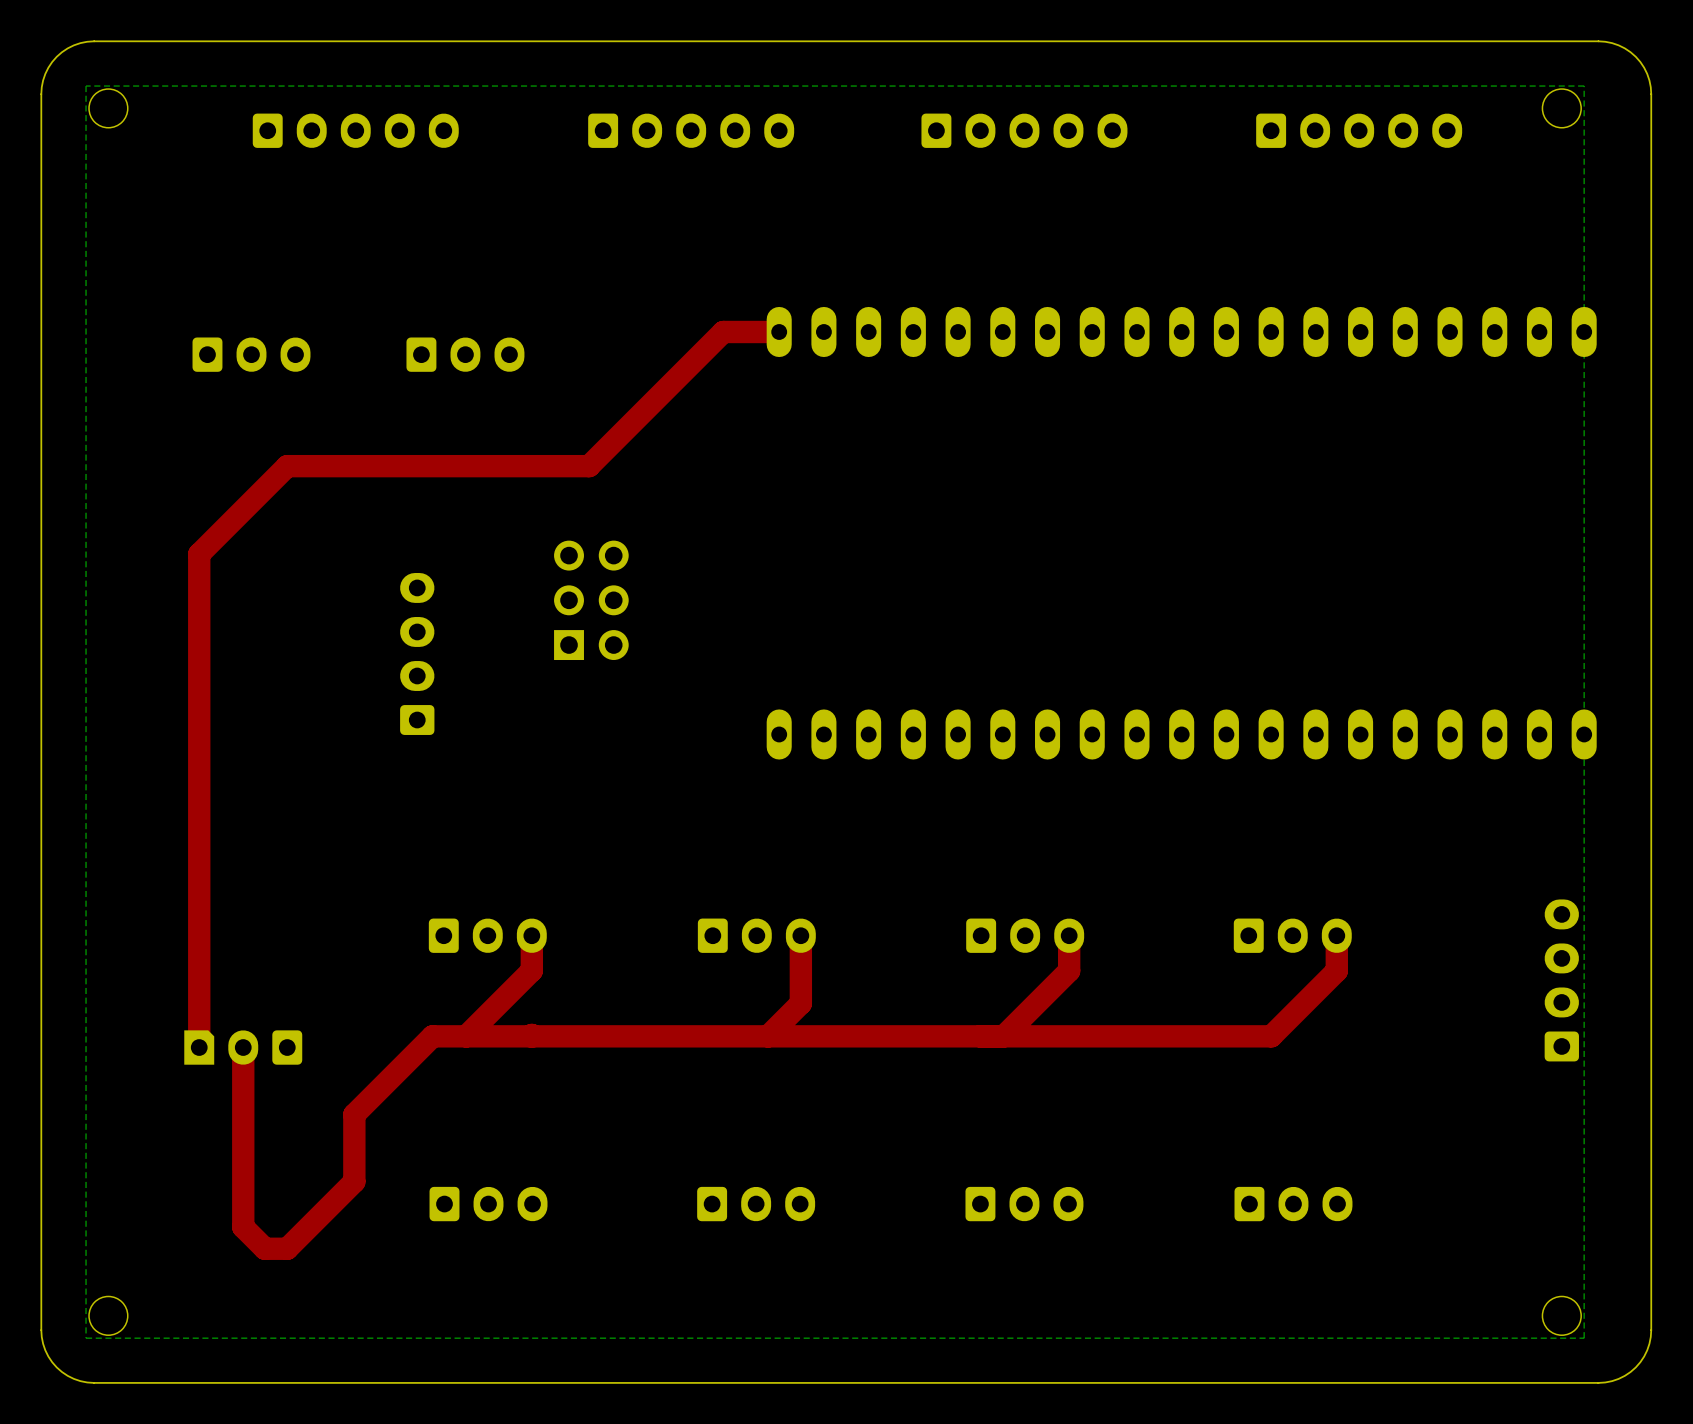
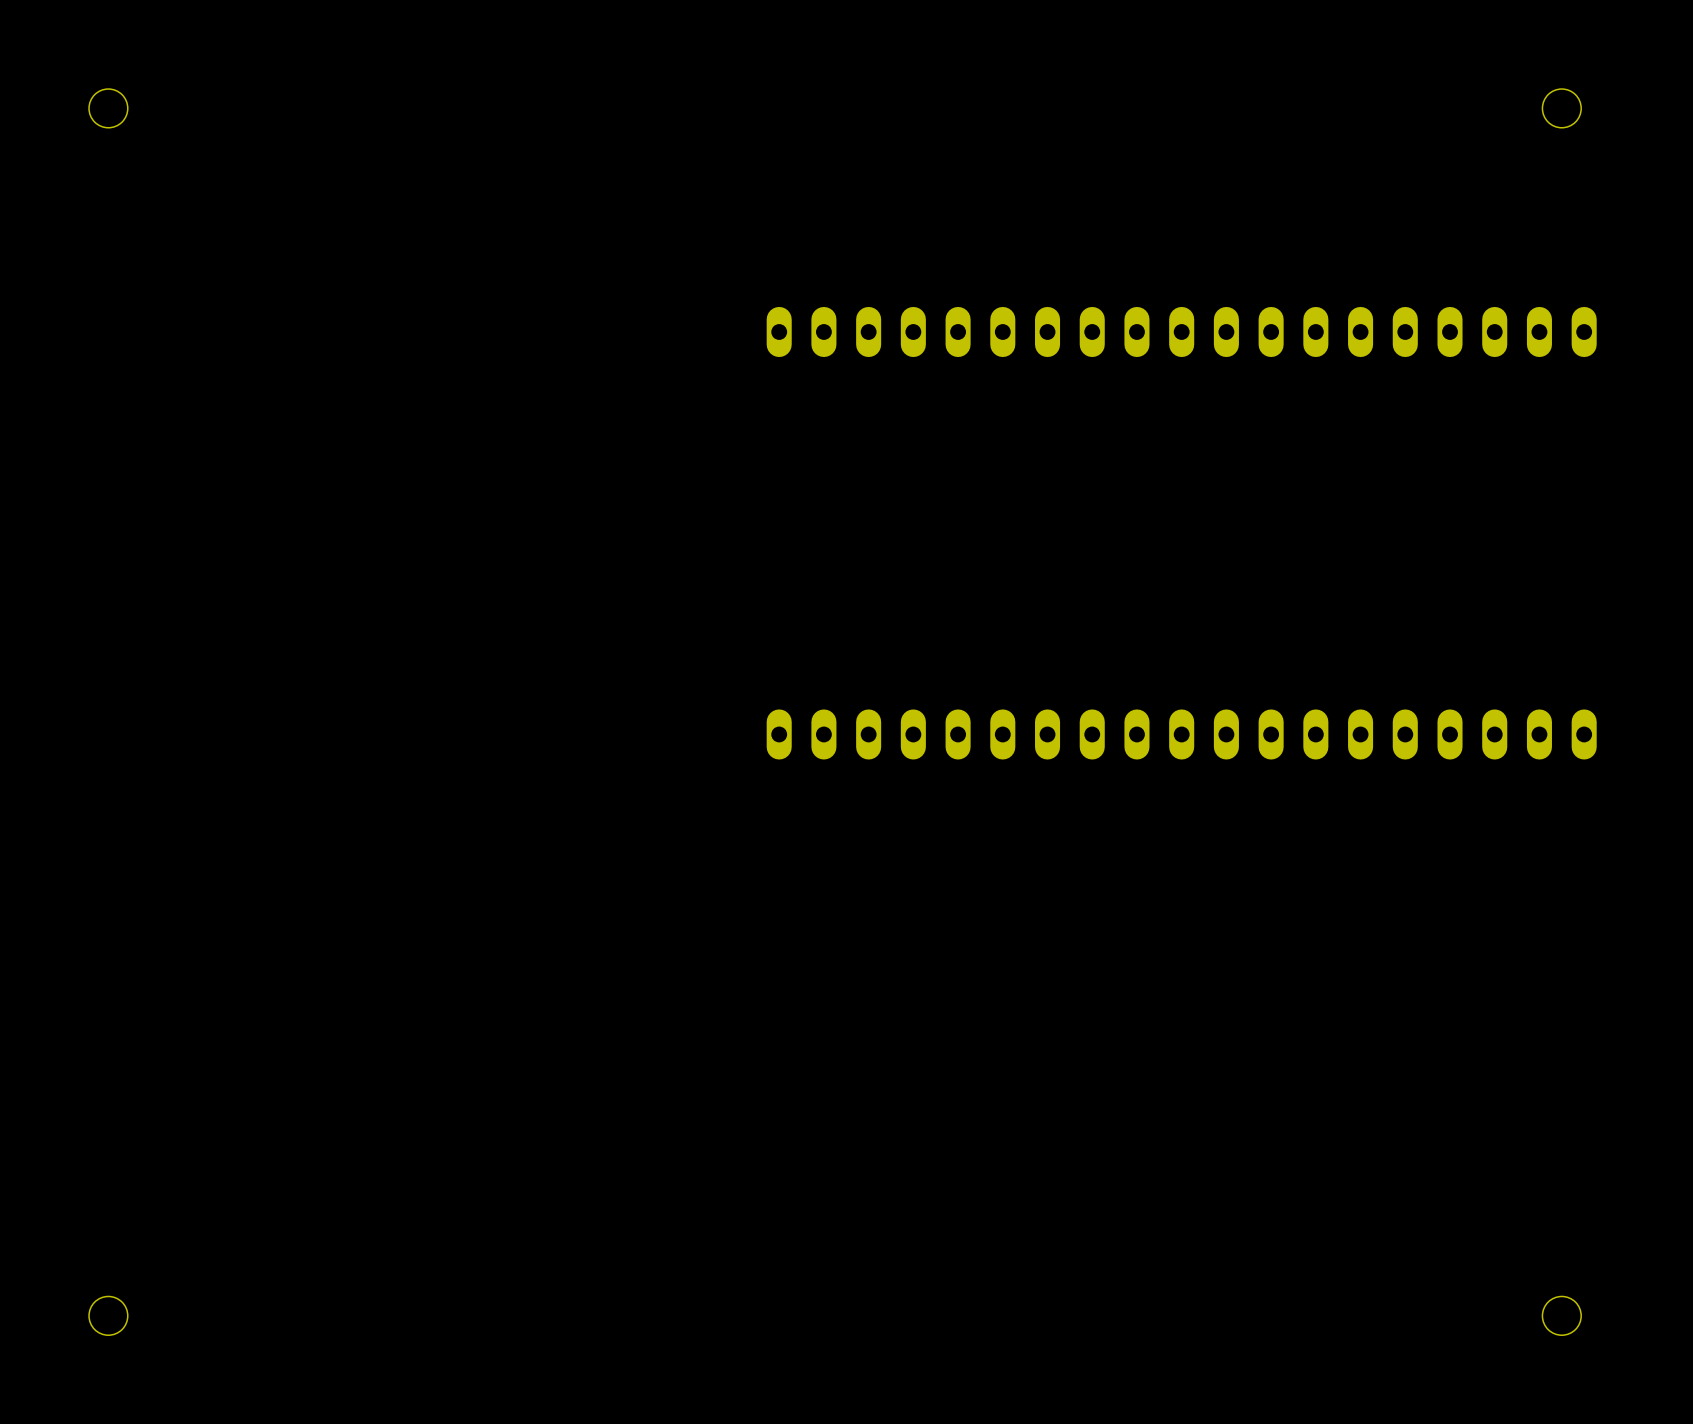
board edge: (1598, 41) (94, 41) (80, 43) (61, 52) (52, 61) (45, 73) (41, 94) (41, 1330) (45, 1350) (52, 1362) (67, 1375) (80, 1381) (94, 1382) (1598, 1382) (1612, 1381) (1630, 1372) (1644, 1356) (1649, 1343) (1651, 1330) (1651, 94) (1647, 73) (1635, 56) (1618, 45) (1598, 41) -> none
bottom zone outline: (1584, 86) (1584, 1338) (86, 1338) (86, 86) (1584, 86) -> none
part: (355, 130) -> none
part: (691, 130) -> none
part: (1024, 130) -> none
part: (1359, 130) -> none
top track: (779, 331) (723, 331) (589, 466) (287, 466) (199, 554) (199, 1047) -> none
part: (251, 354) -> none
part: (465, 354) -> none
part: (591, 600) -> none
part: (417, 653) -> none
part: (487, 935) -> none
top track: (531, 935) (531, 970) (466, 1036) -> none
part: (756, 935) -> none
top track: (800, 935) (800, 1003) (768, 1036) -> none
part: (1025, 935) -> none
top track: (1069, 935) (1069, 970) (1003, 1036) -> none
part: (1292, 935) -> none
top track: (1336, 935) (1336, 970) (1271, 1036) (432, 1036) (354, 1114) (354, 1181) (287, 1248) (264, 1248) (243, 1227) (243, 1047) -> none
part: (1561, 980) -> none
part: (243, 1047) -> none
part: (488, 1204) -> none
part: (756, 1204) -> none
part: (1024, 1204) -> none
part: (1293, 1204) -> none

